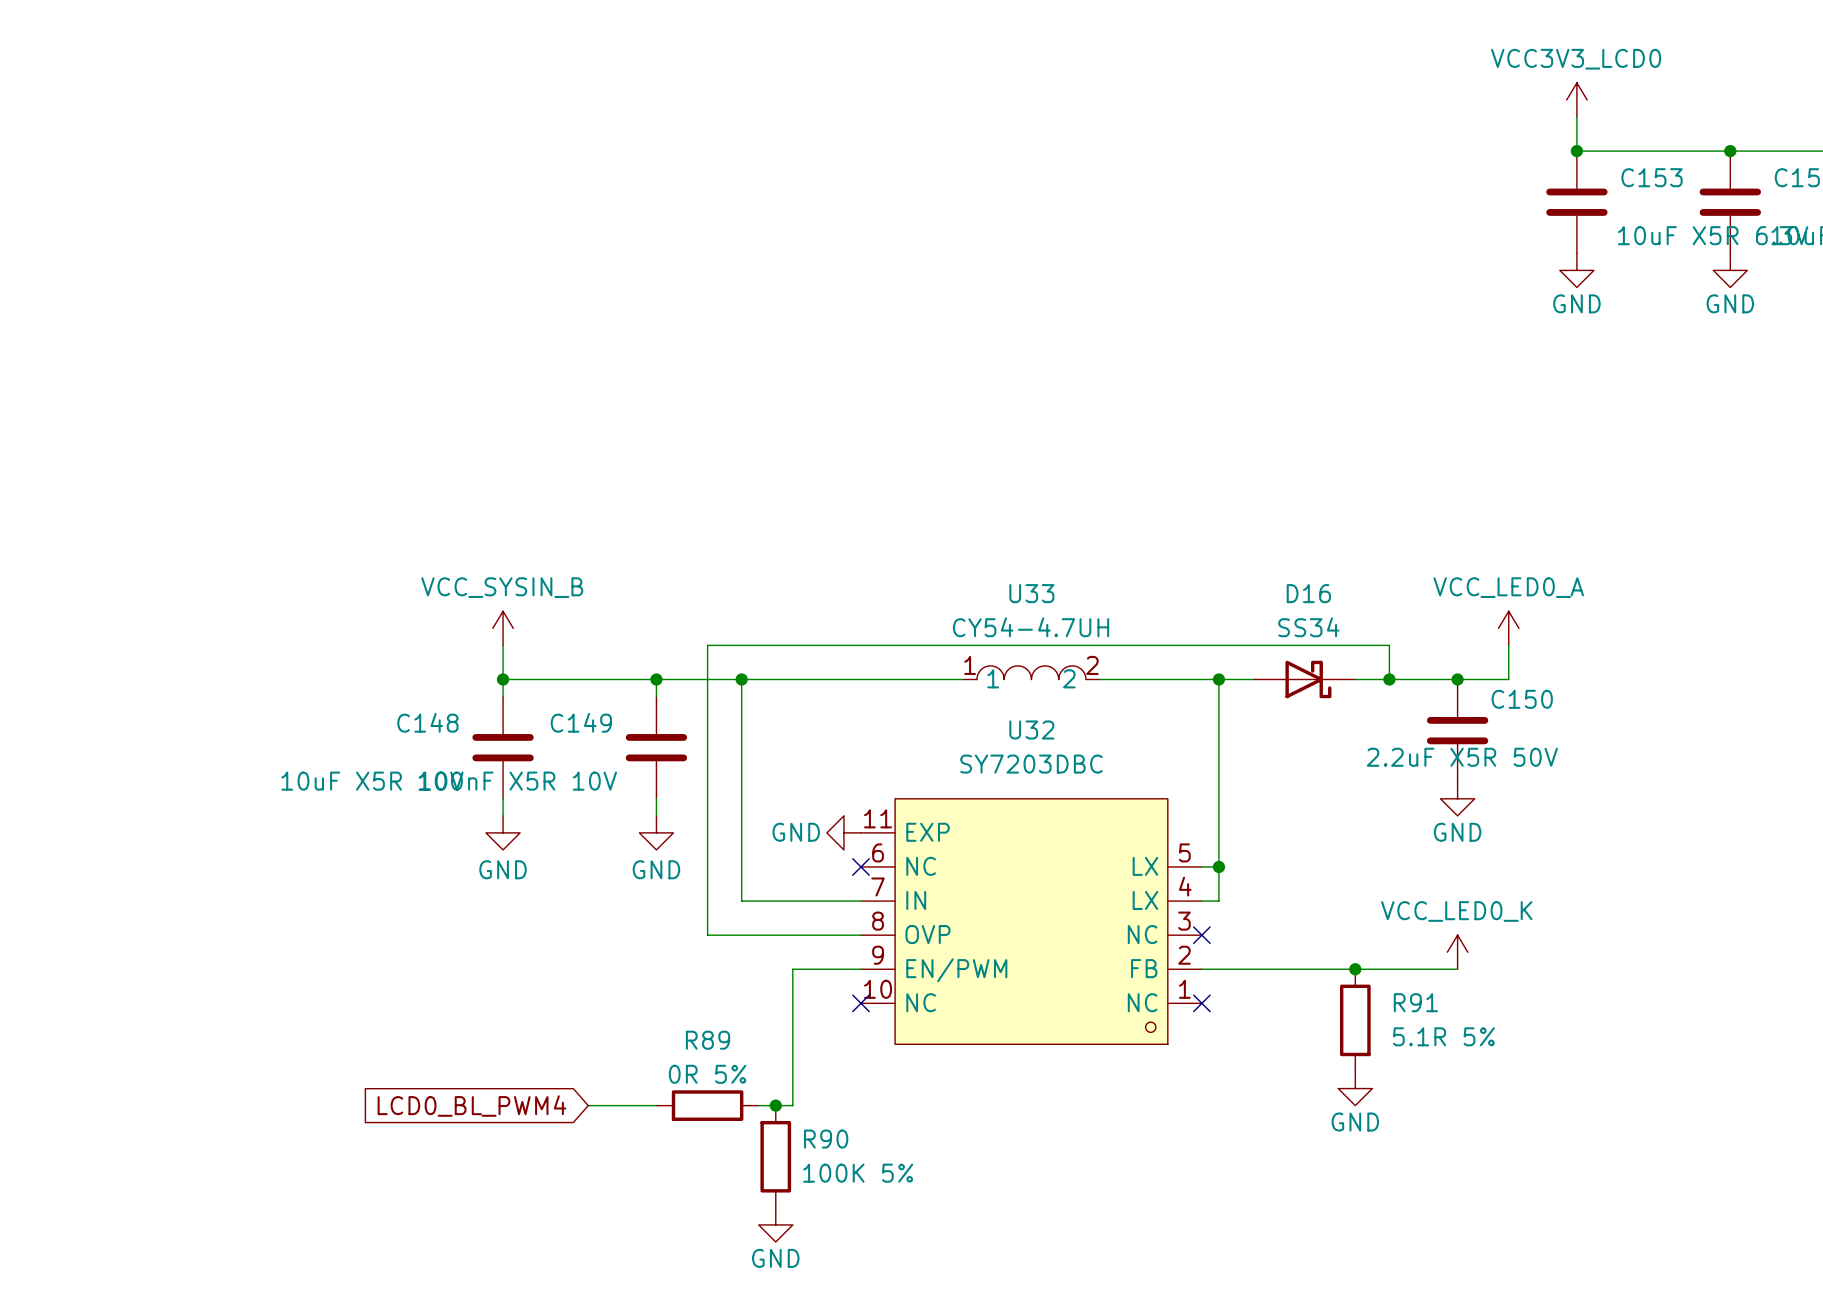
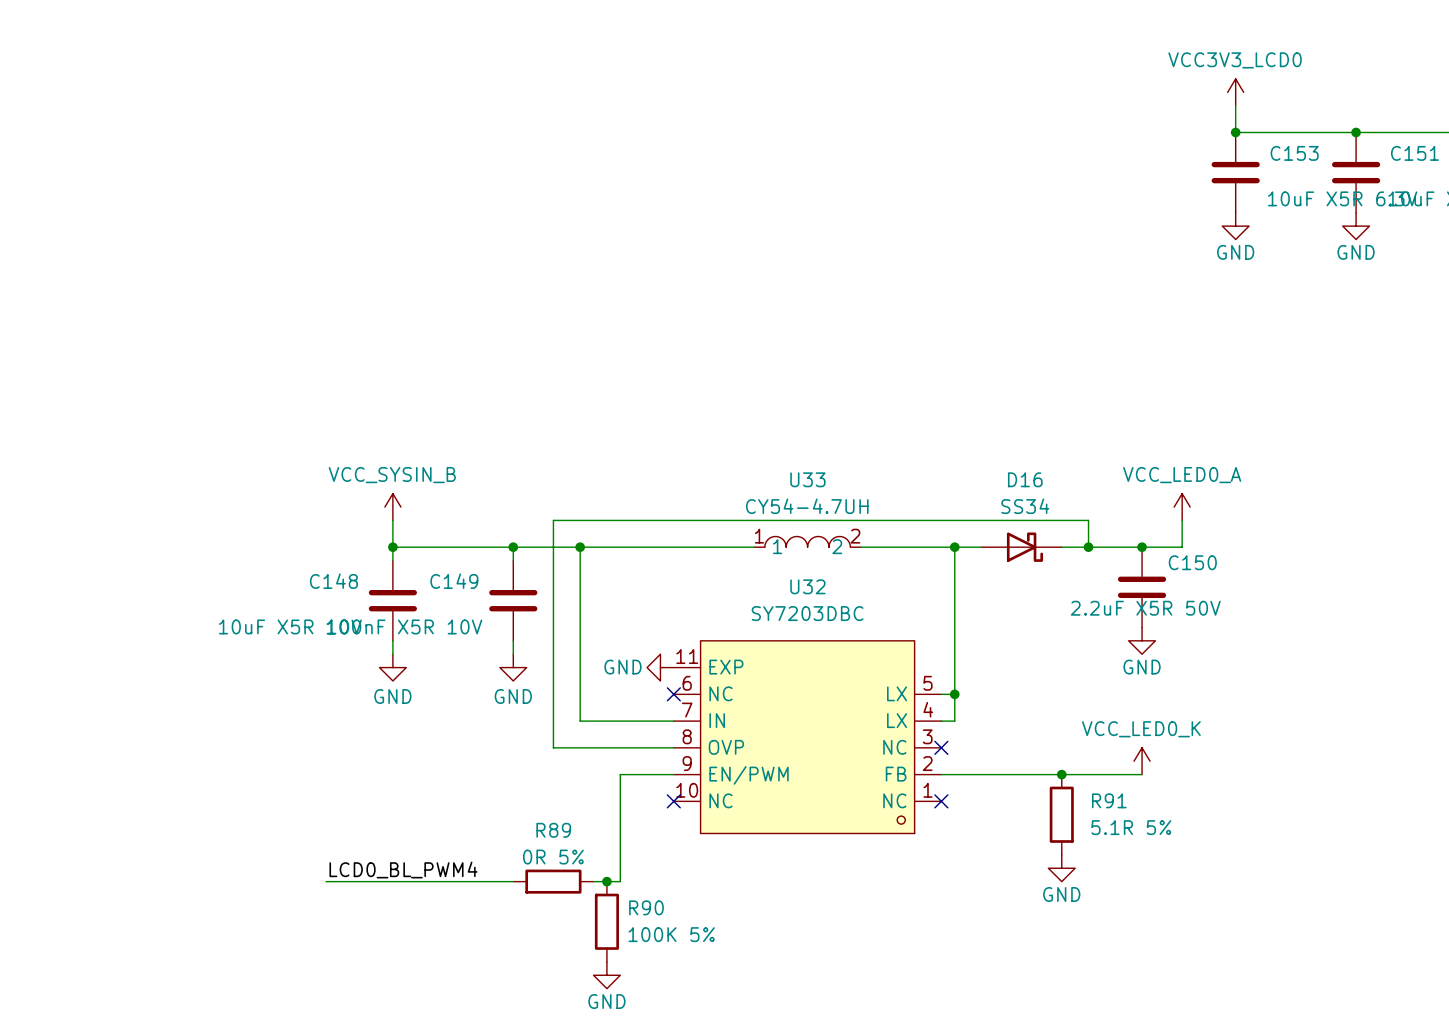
label: none -> LCD0_BL_PWM4 (403, 870)
wire: none -> (326, 881) (459, 881)
global label: LCD0_BL_PWM4 (471, 1106) -> none

